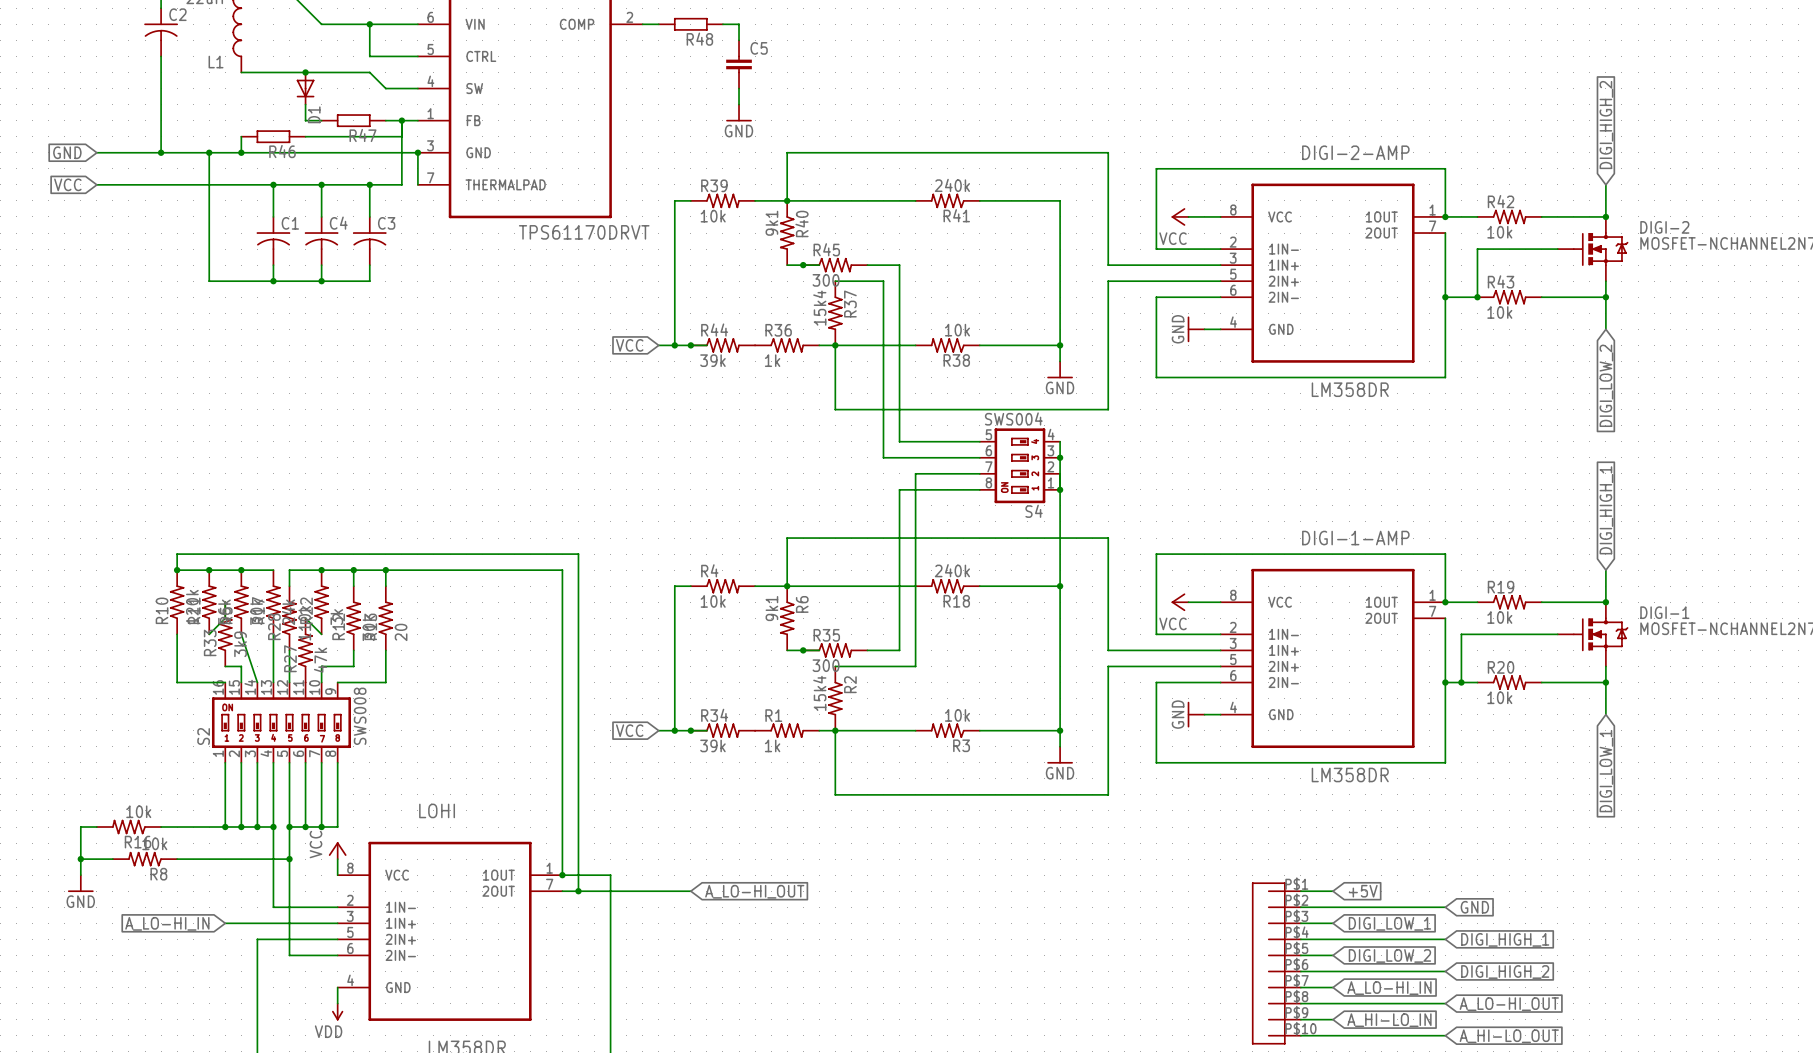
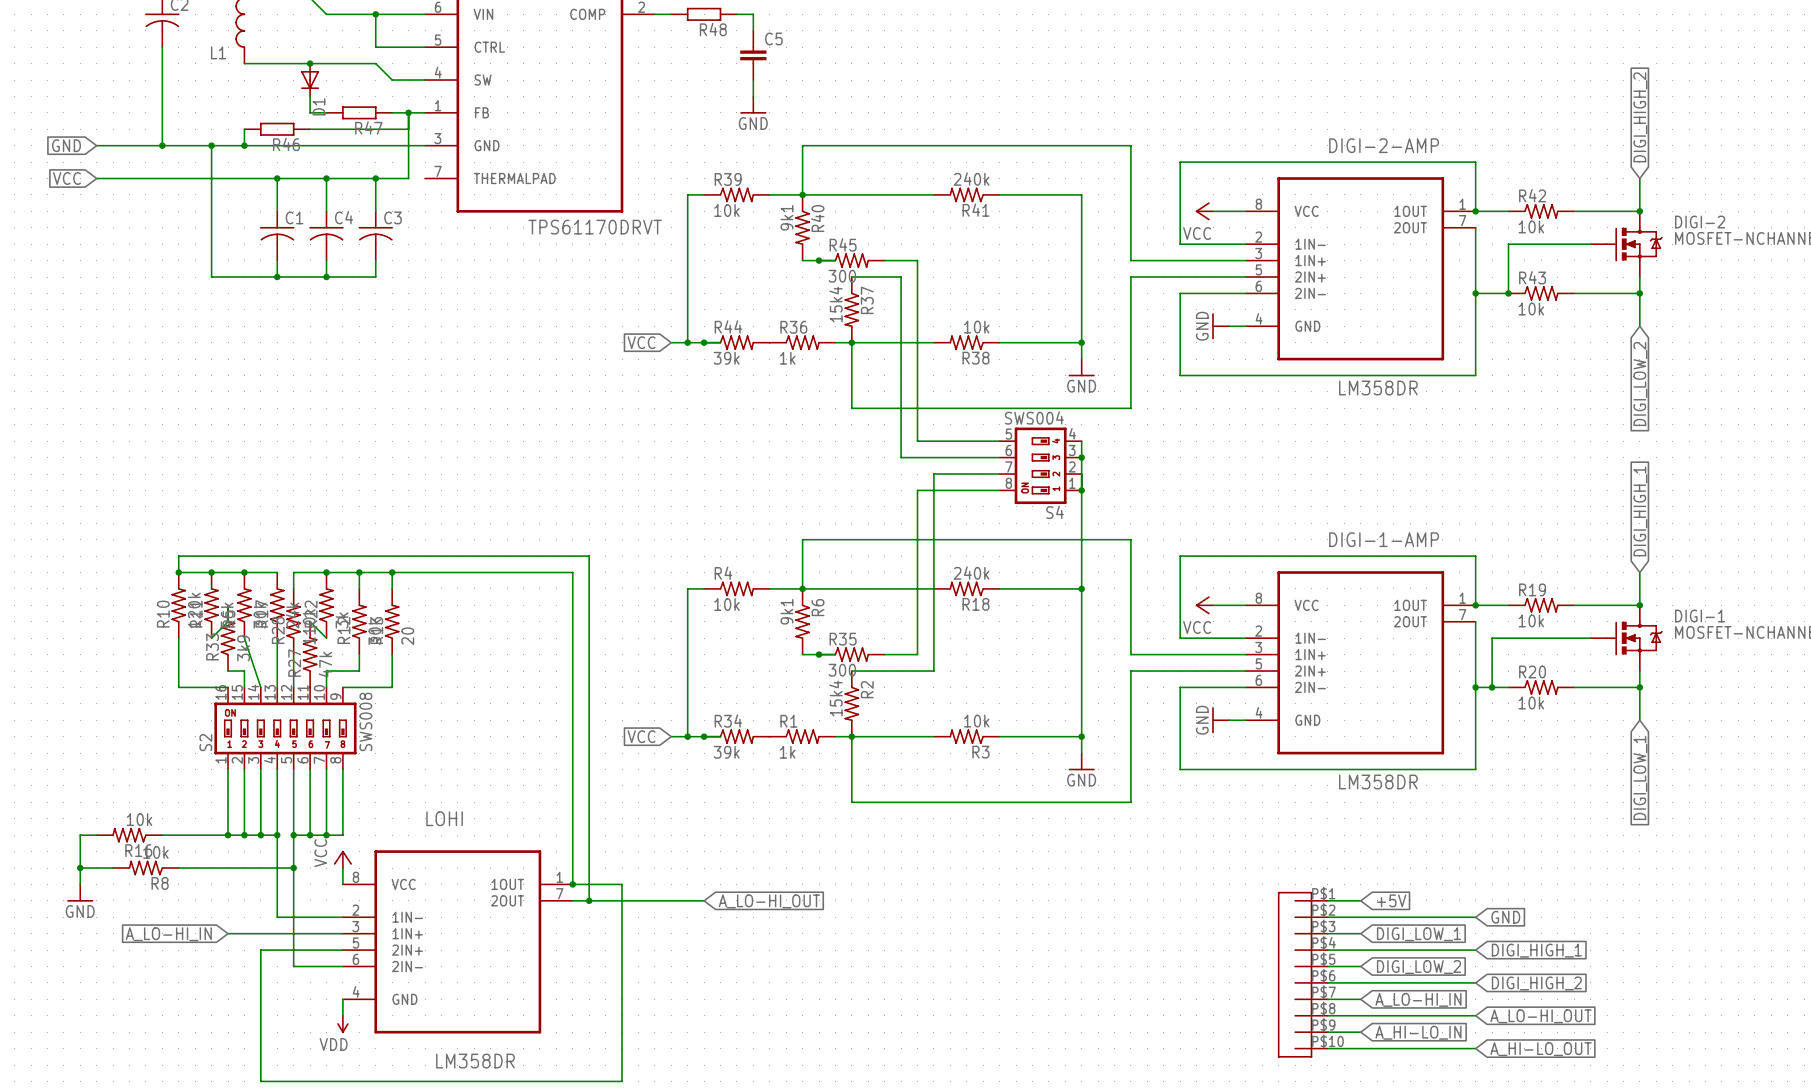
wire: (417, 152) (417, 184) -> none
junction: (417, 152) -> none

